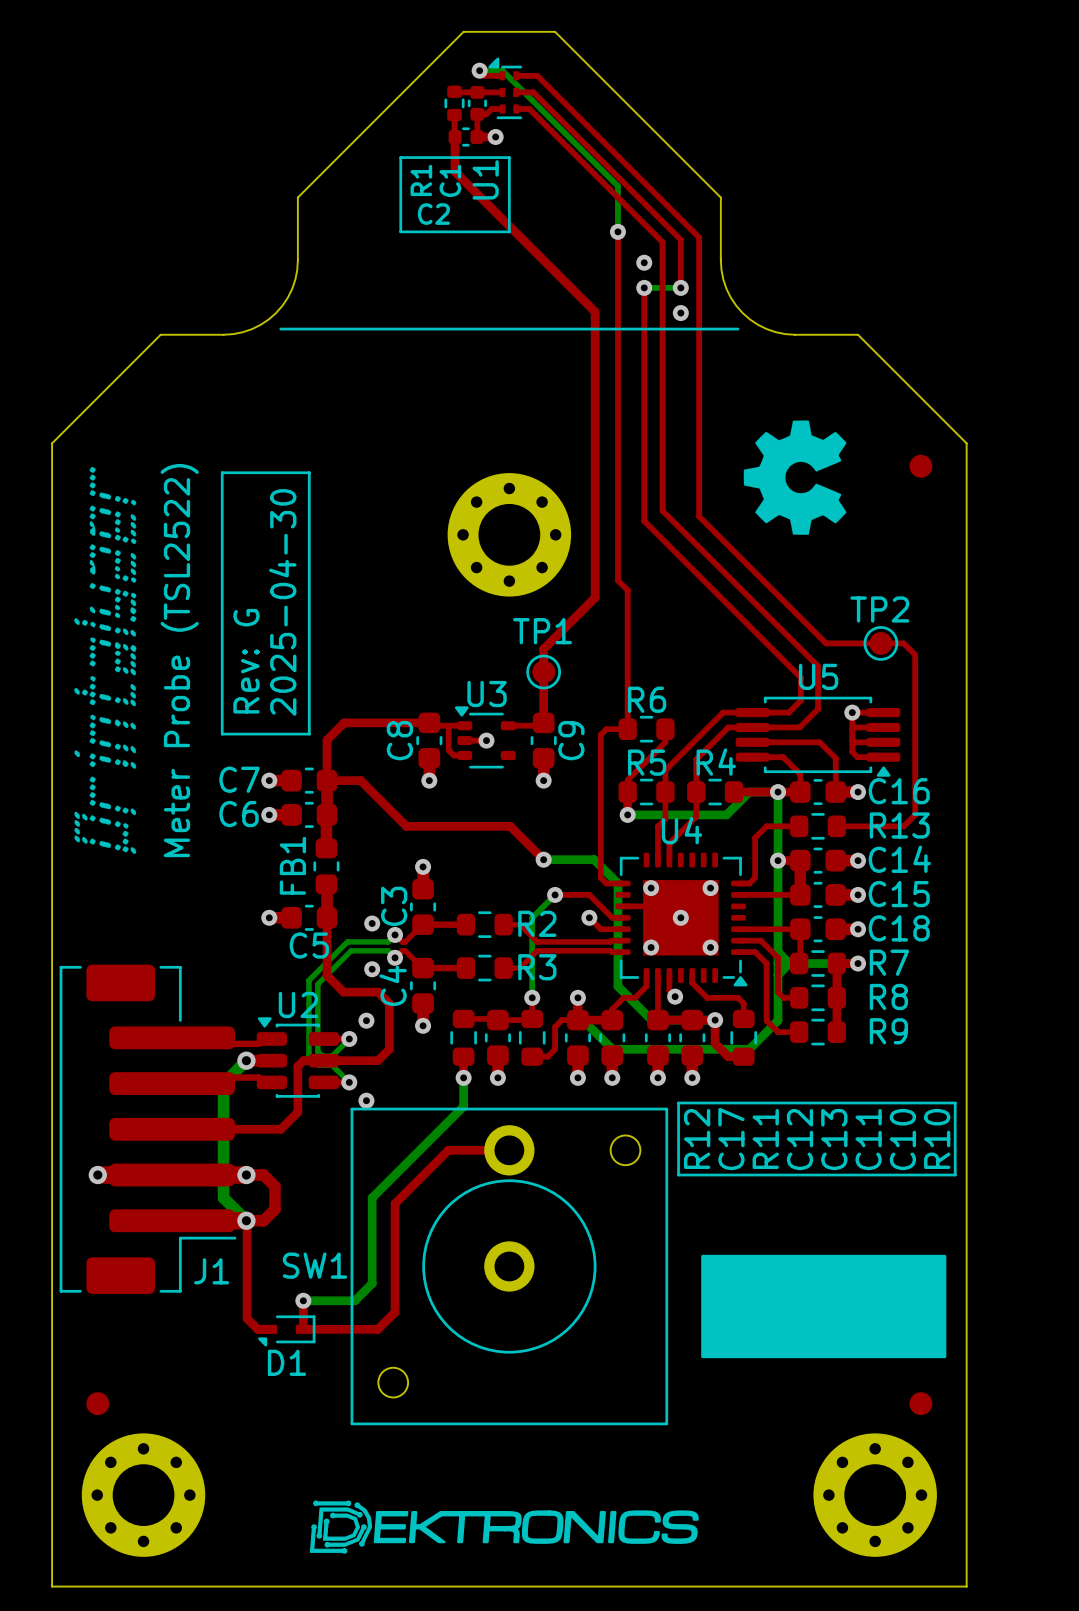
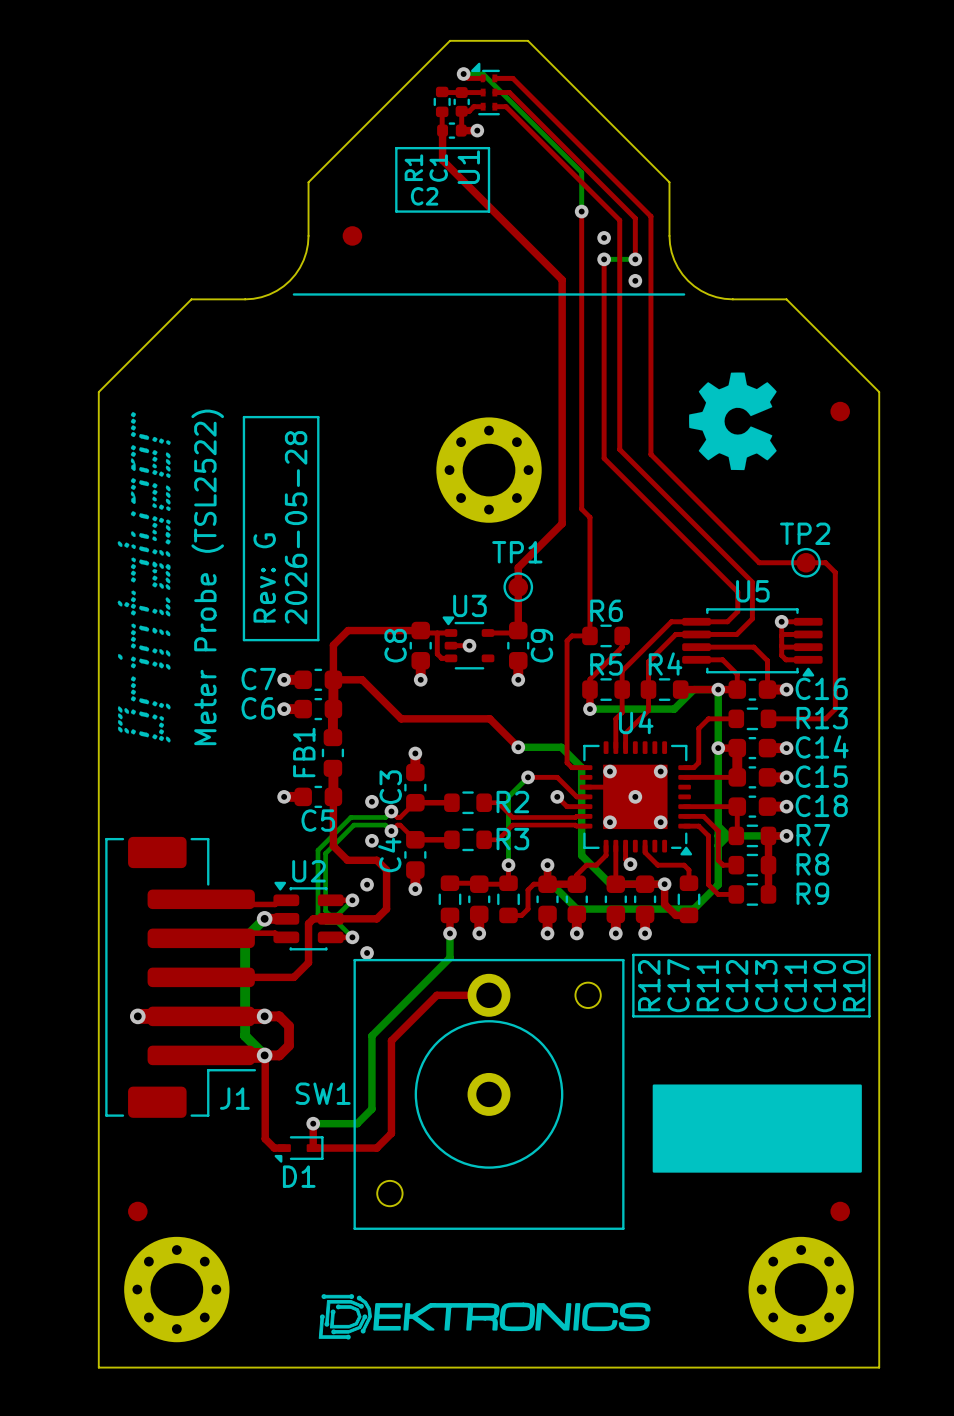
part: none -> (352, 235)
text: 2025-04-30 (282, 602) -> 2026-05-28 (296, 527)

